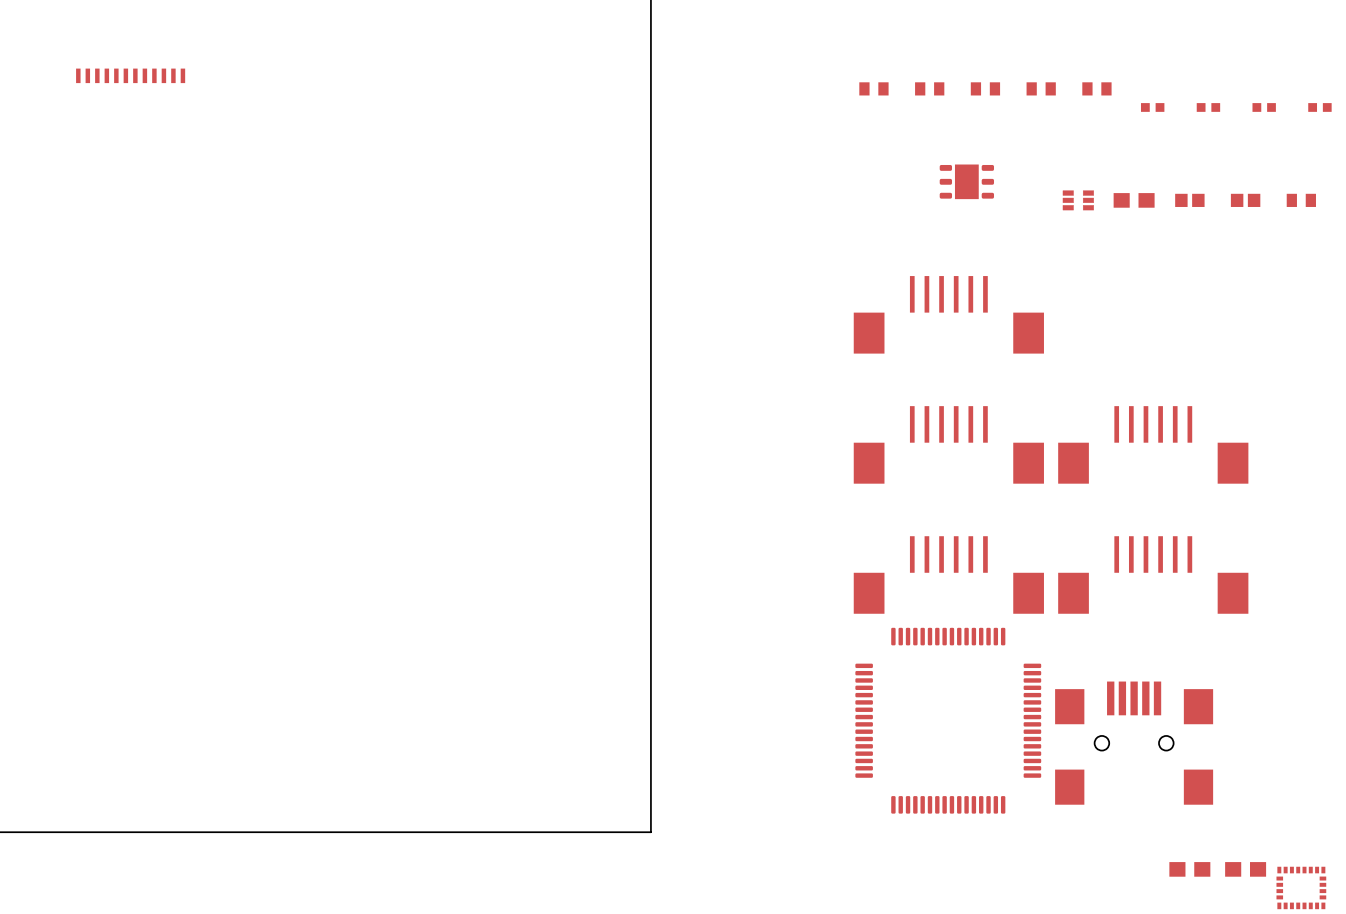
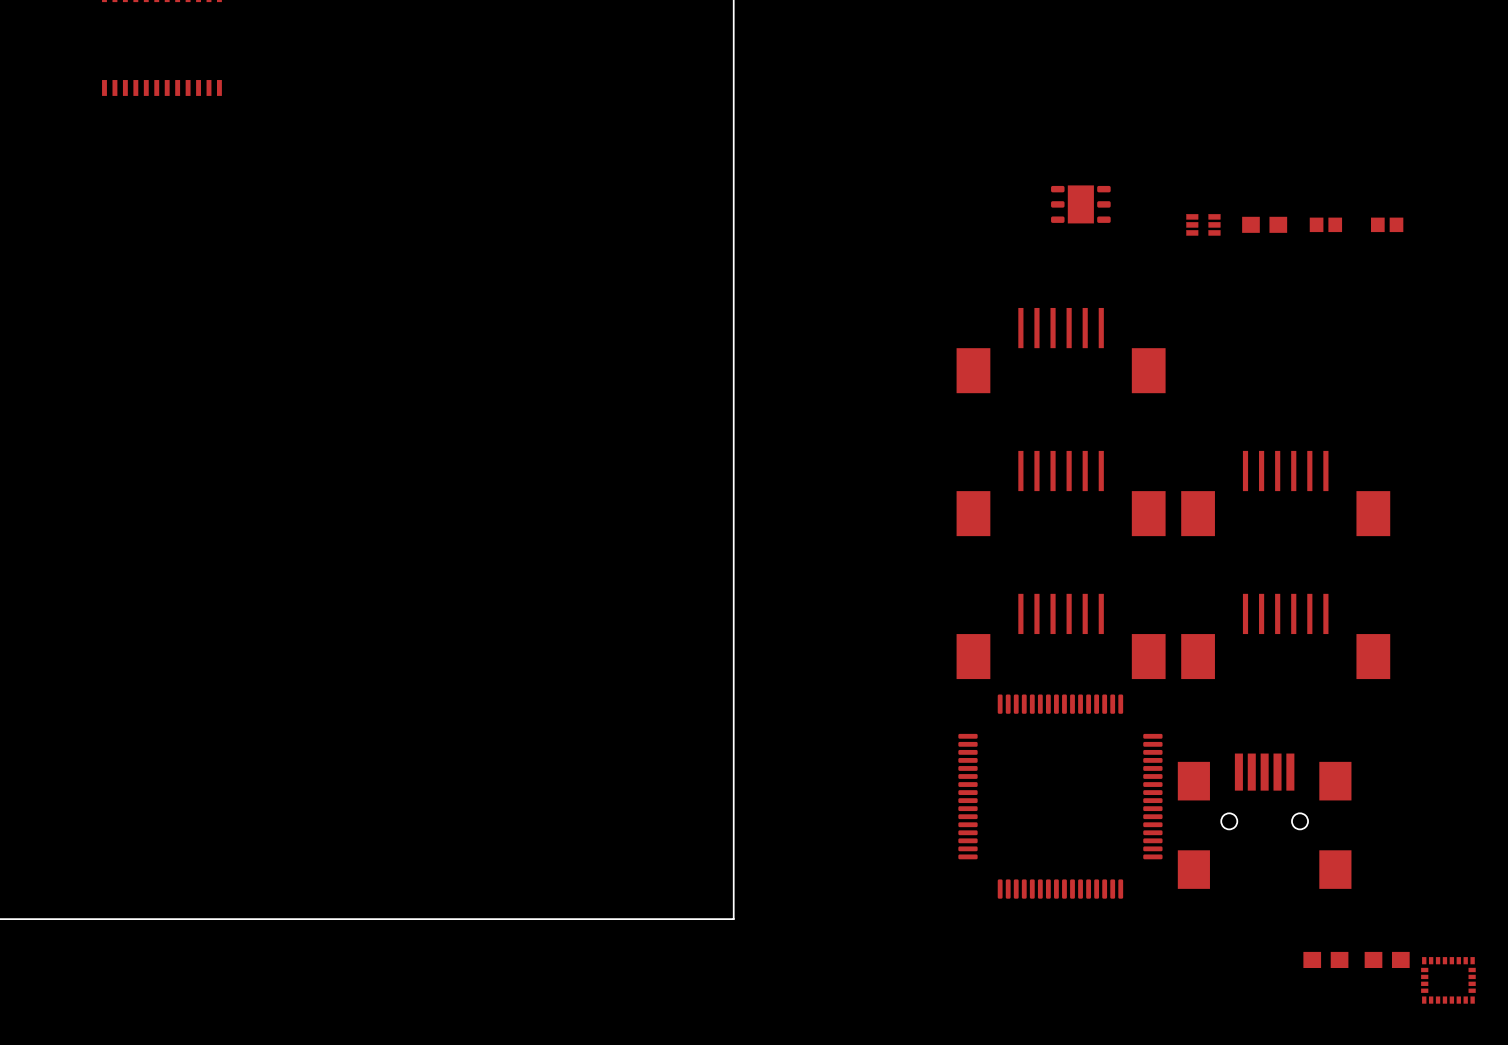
part: (873, 88) -> none
part: (929, 88) -> none
part: (985, 88) -> none
part: (1041, 88) -> none
part: (1096, 88) -> none
part: (1152, 107) -> none
part: (1208, 107) -> none
part: (1264, 107) -> none
part: (1319, 107) -> none
part: (1301, 200) -> none

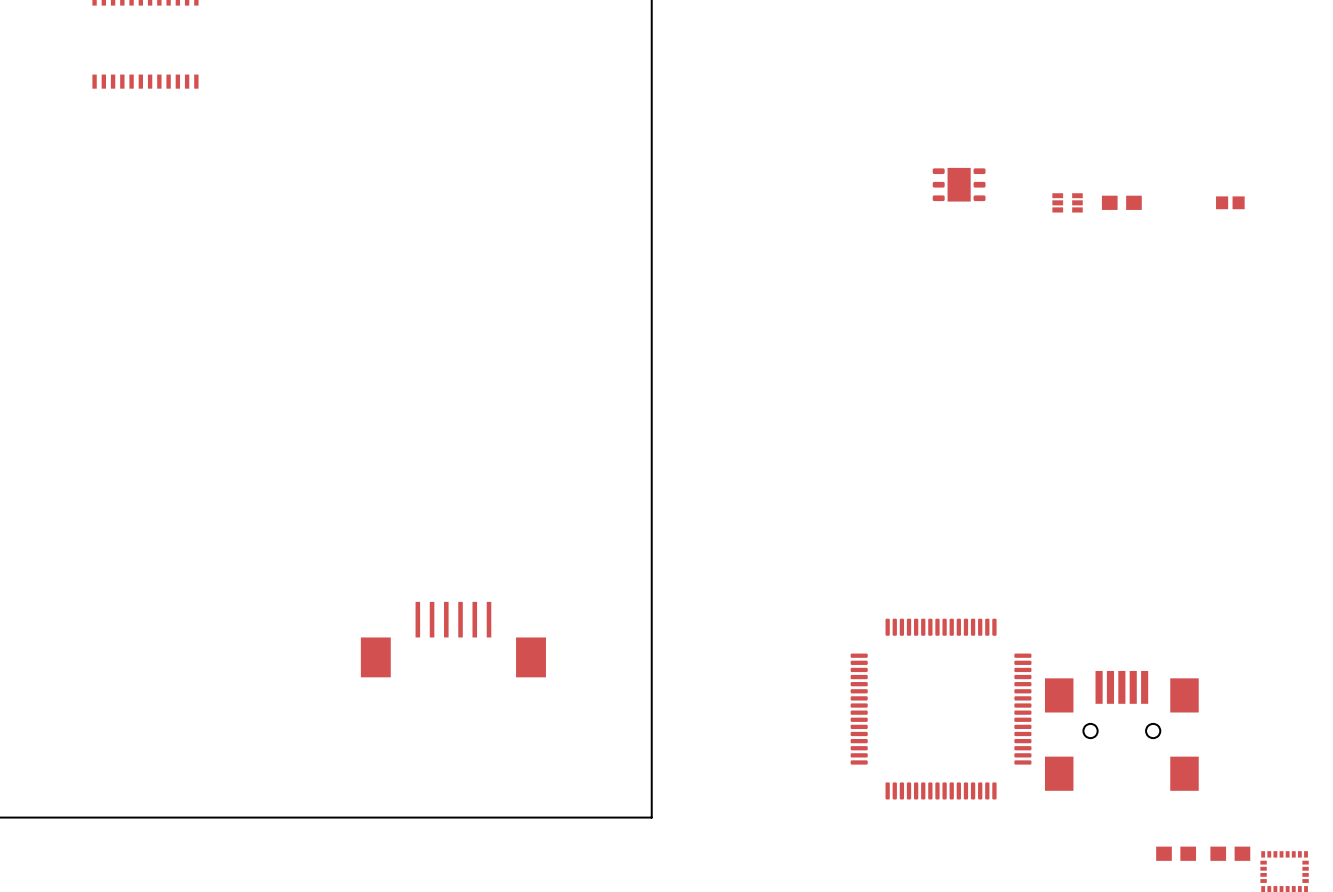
part: (1325, 224) -> none
part: (1061, 350) -> none
part: (1061, 493) -> none
part: (1285, 493) -> none
part: (1061, 636) -> none
part: (1285, 636) -> none
part: none -> (453, 639)

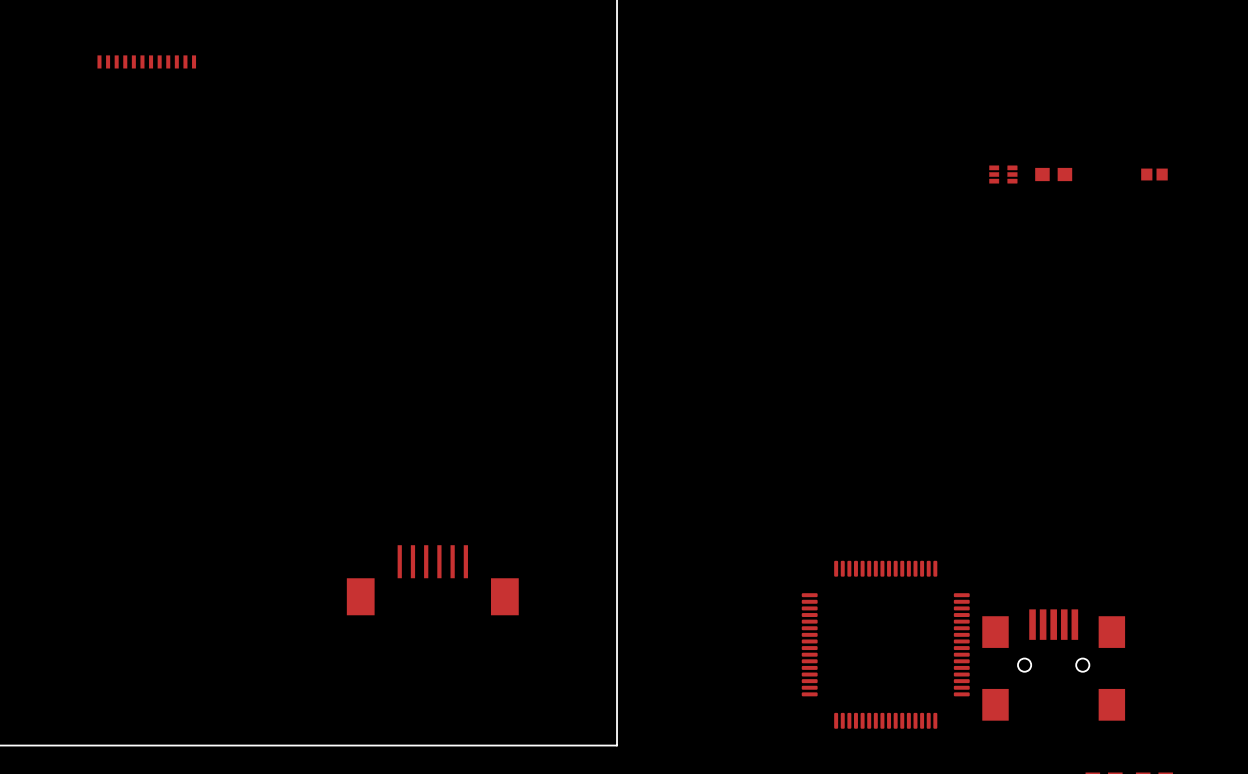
part: (959, 184) -> none

